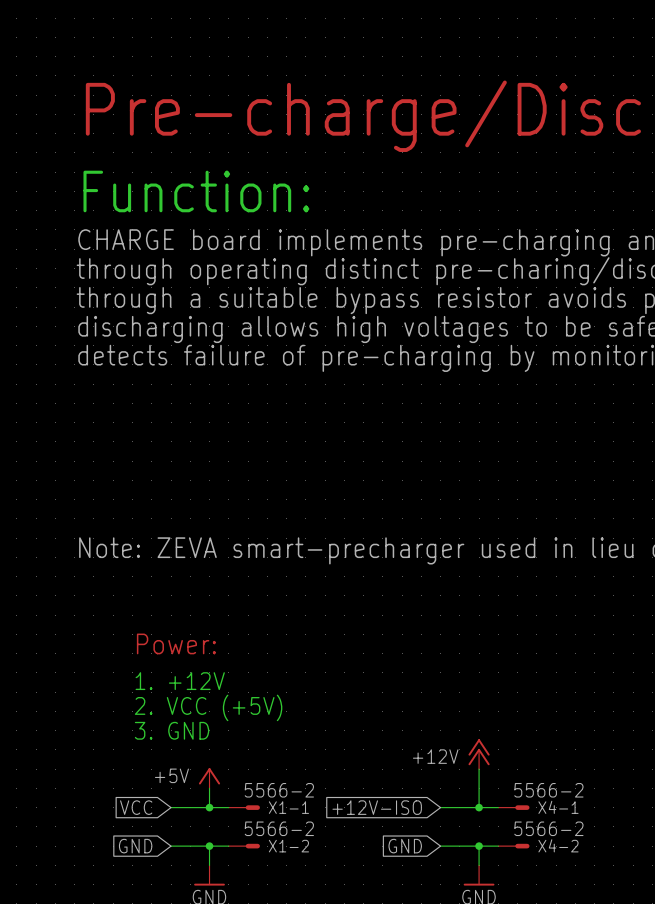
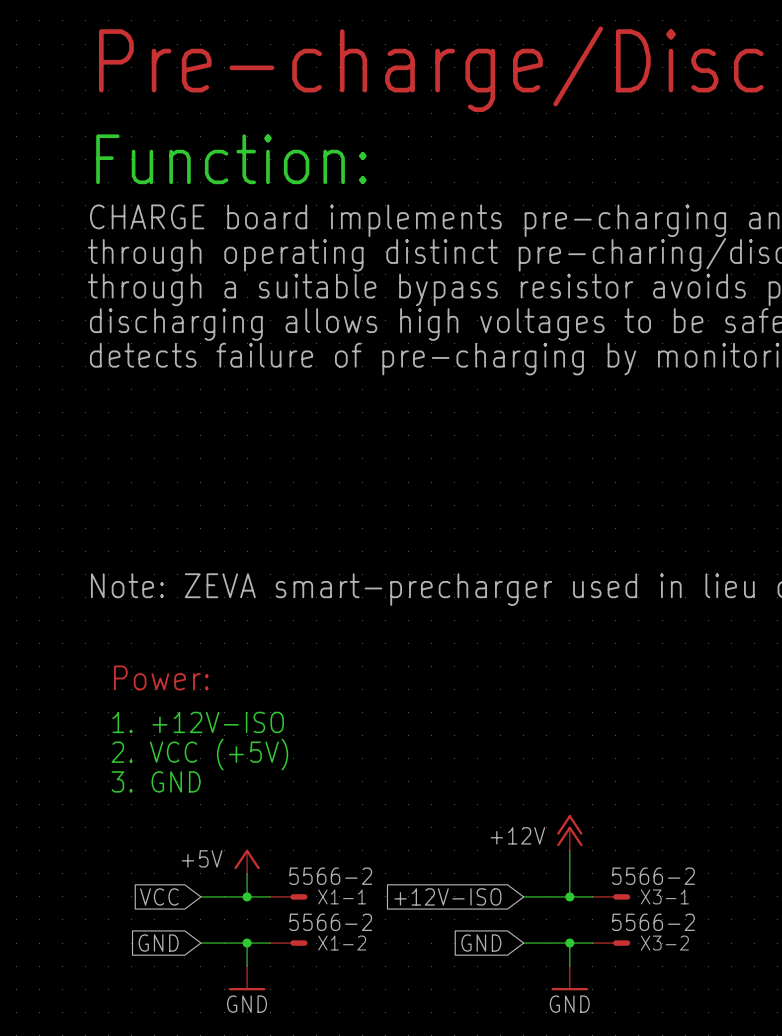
text position: Power: (176, 643) -> Power: (161, 677)
text: 1. +12V (180, 681) -> 1. +12V-ISO (198, 722)
text position: 2. VCC (+5V) (208, 707) -> 2. VCC (+5V) (199, 754)
text position: 3. GND (172, 730) -> 3. GND (156, 781)
X4-1 name: X4-1 (558, 807) -> X3-1 (664, 896)
X4-2 name: X4-2 (558, 845) -> X3-2 (664, 943)

